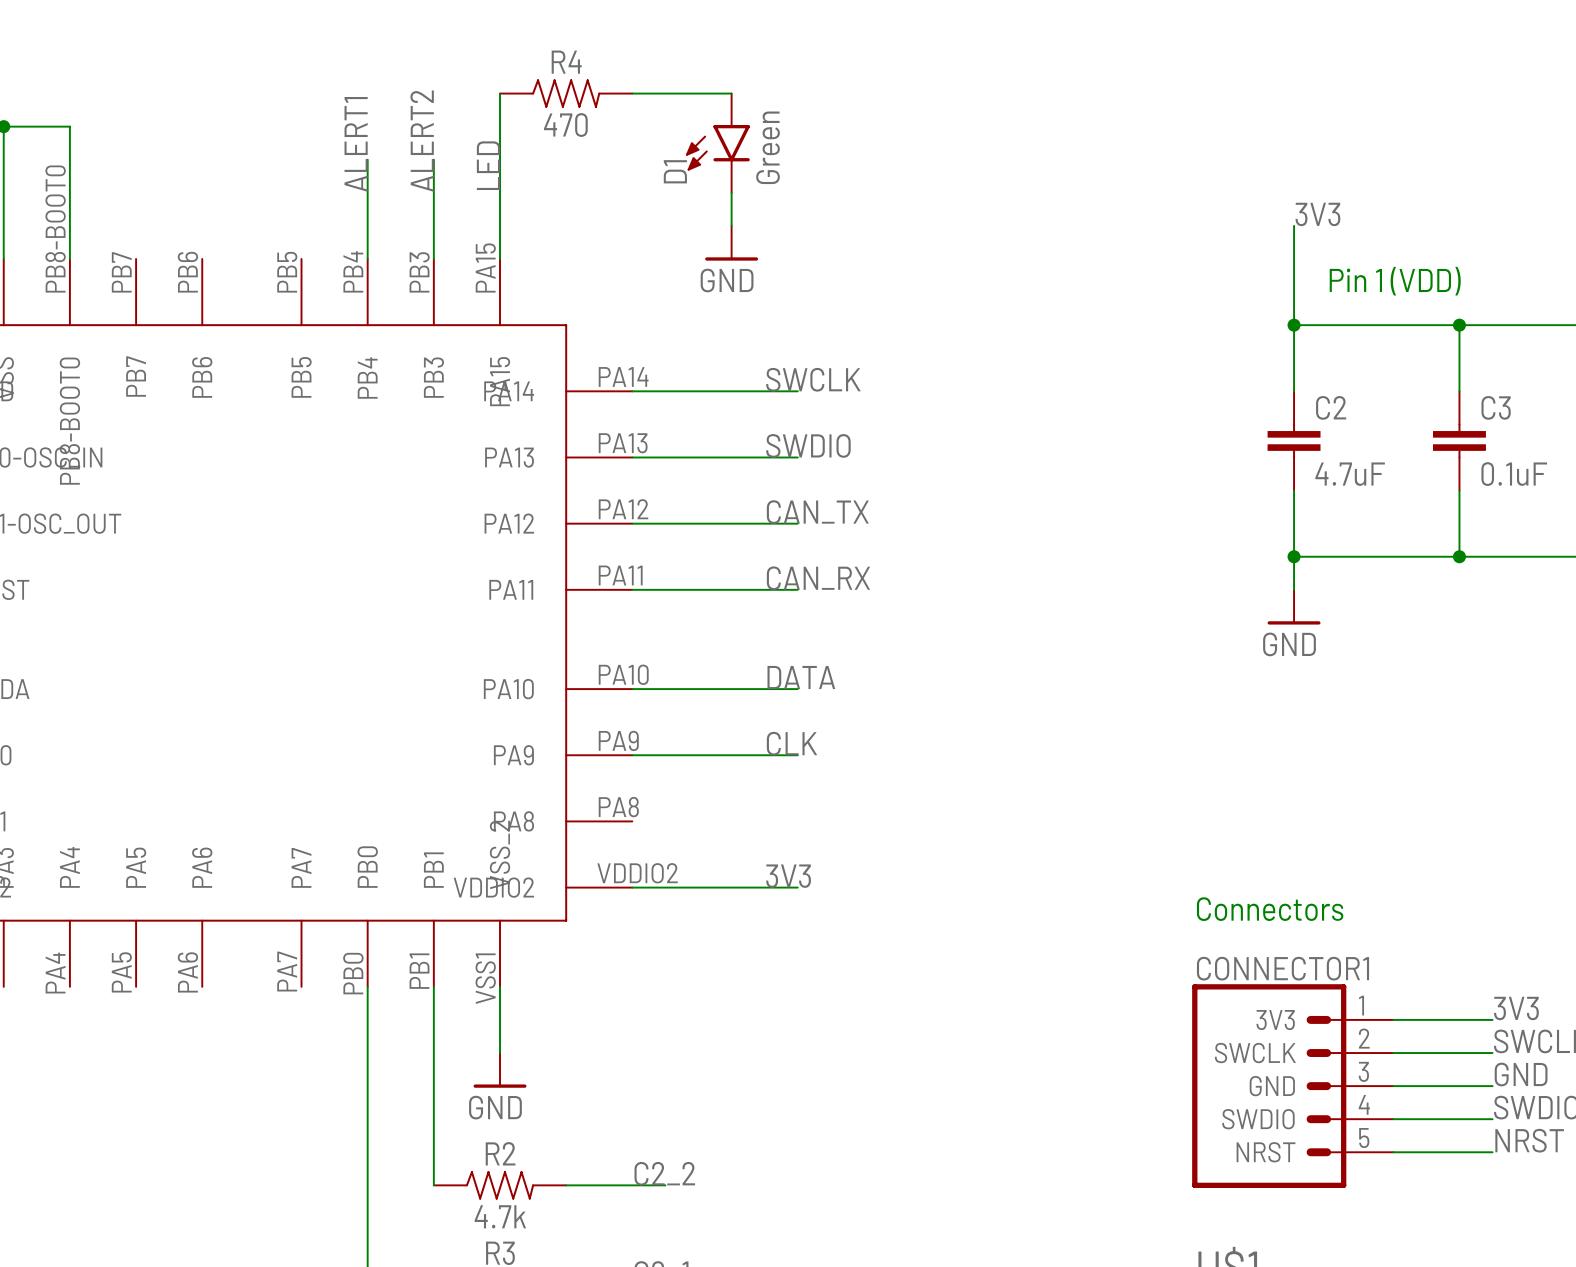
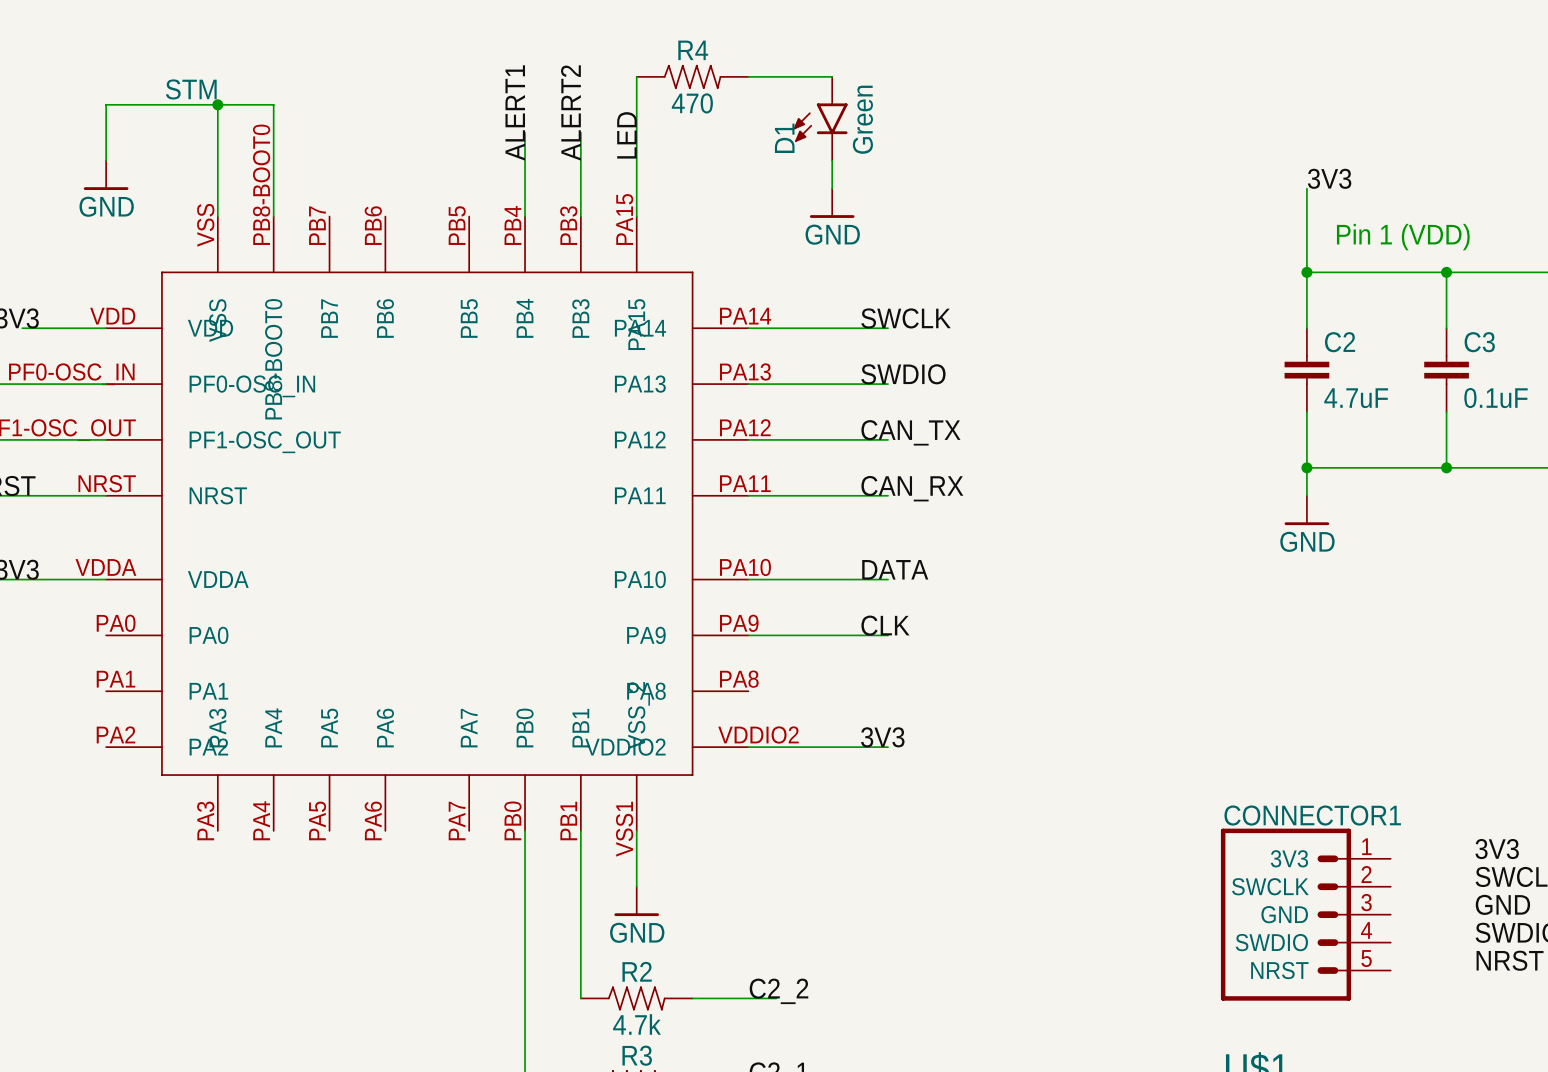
text: Connectors (1270, 909) -> none
wire: (1393, 1019) (1492, 1019) -> none
wire: (1393, 1053) (1492, 1053) -> none
wire: (1393, 1086) (1492, 1086) -> none
wire: (1393, 1119) (1492, 1119) -> none
wire: (1393, 1152) (1492, 1152) -> none

